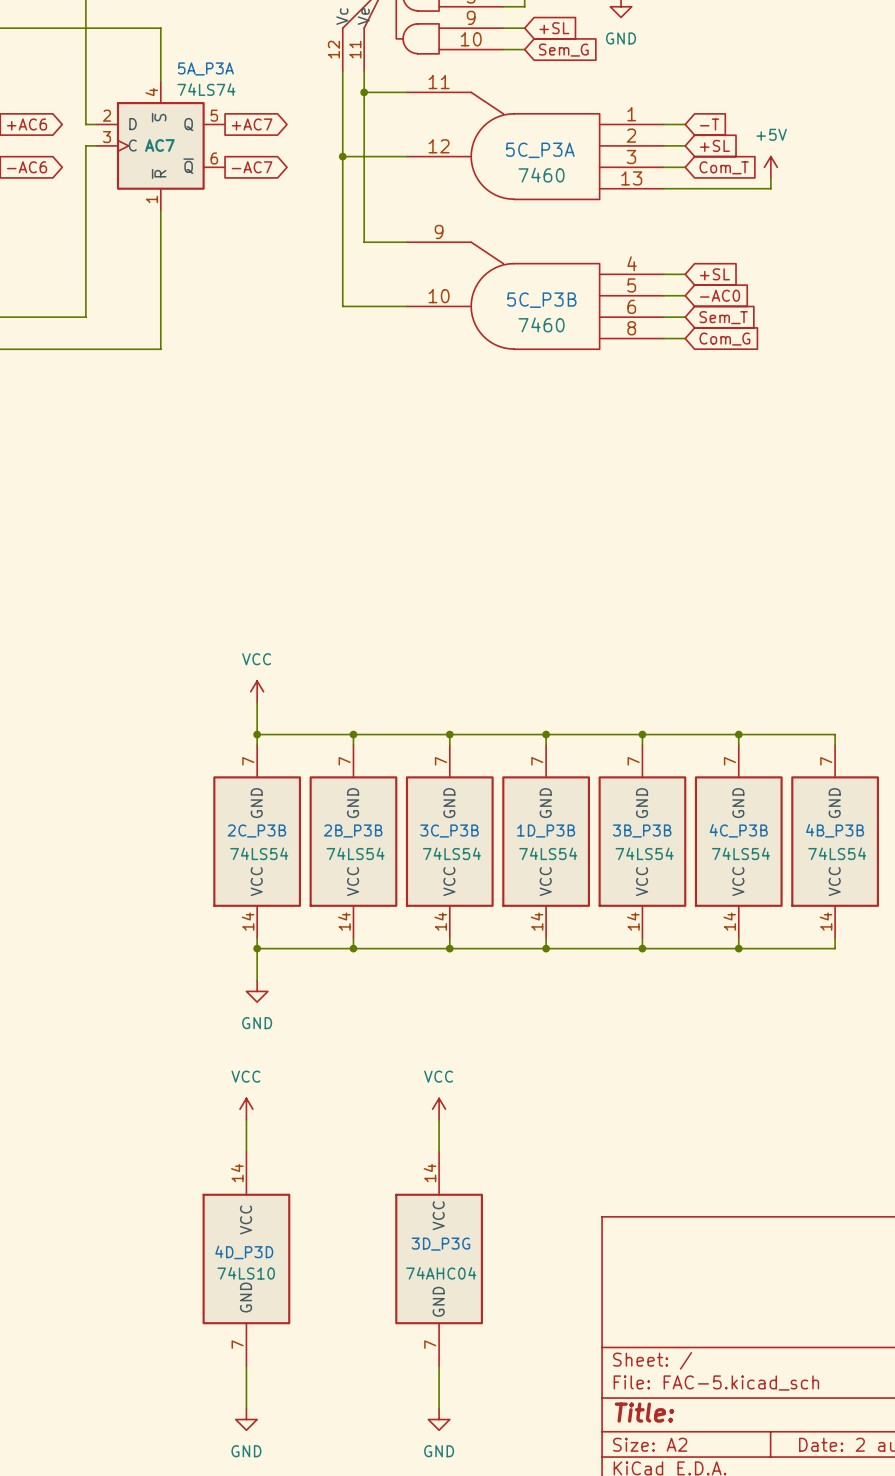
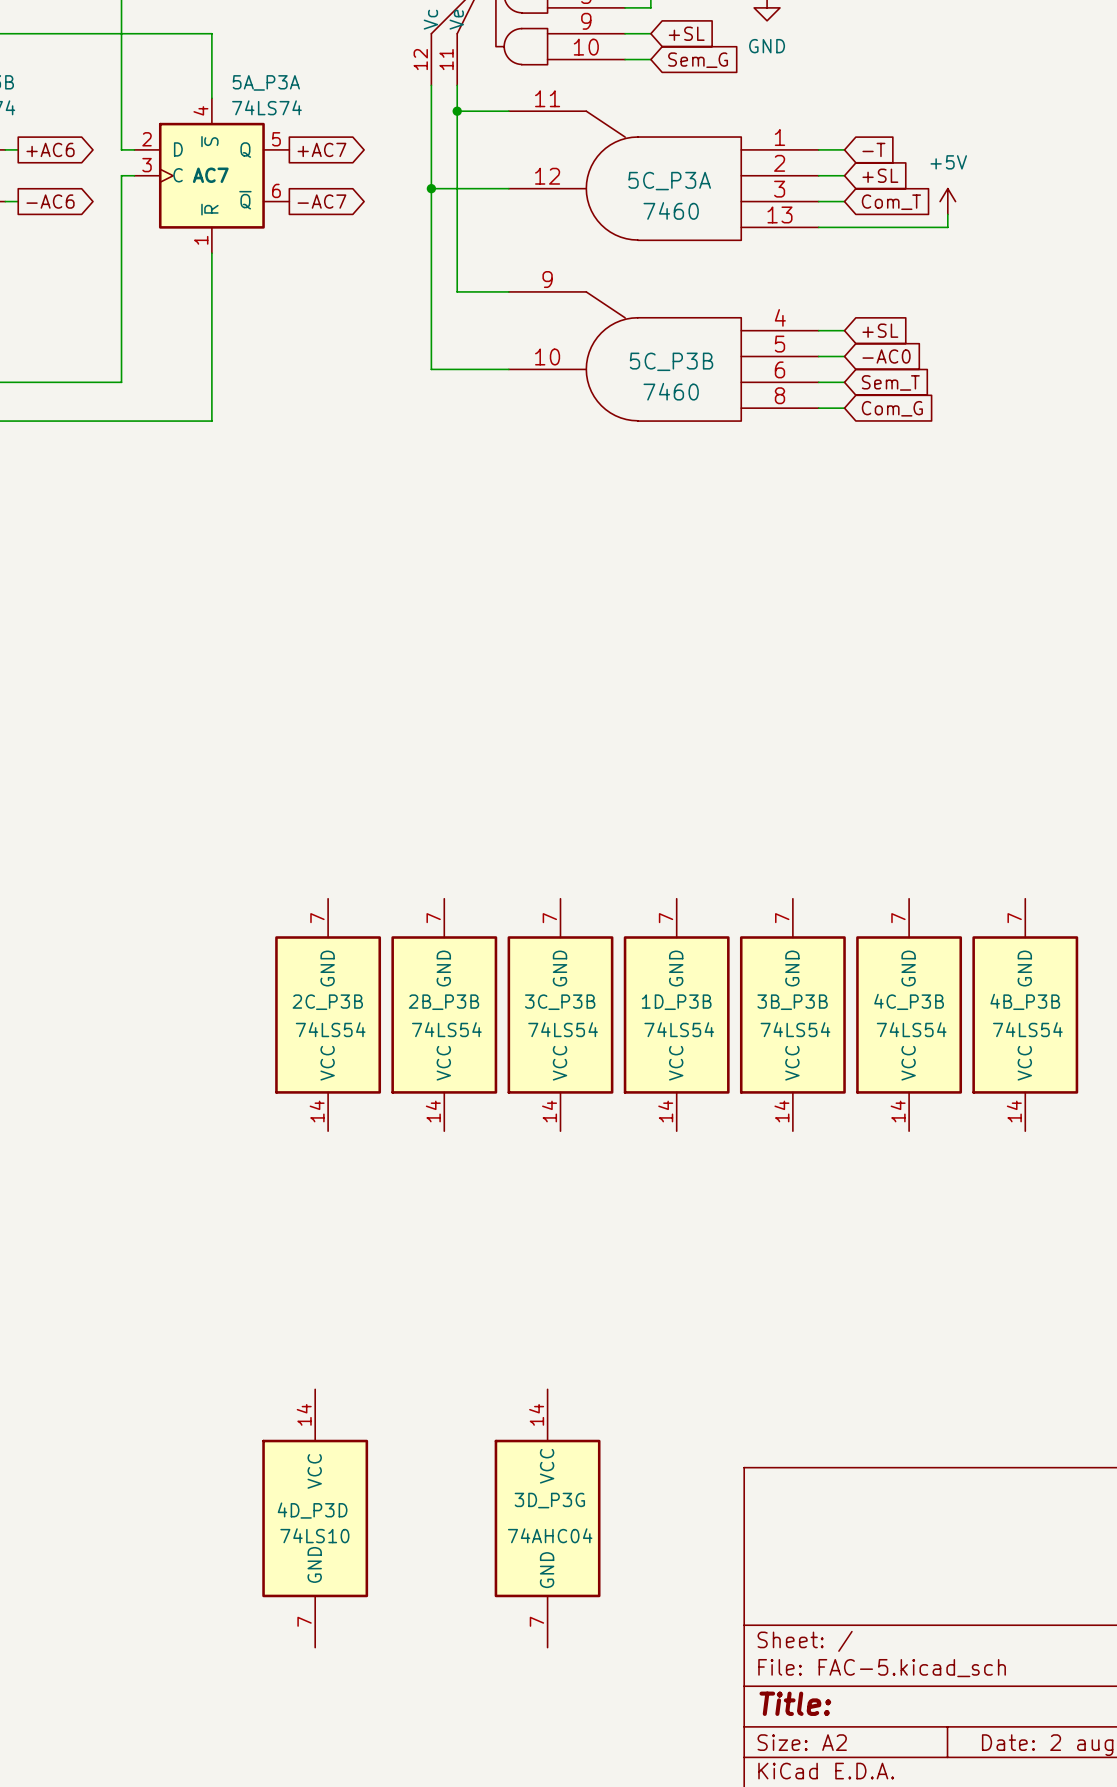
power symbol: VCC (257, 691) -> none
wire: (257, 702) (257, 745) -> none
wire: (257, 734) (835, 734) (835, 745) -> none
junction: (257, 734) -> none
wire: (353, 734) (353, 745) -> none
junction: (353, 734) -> none
wire: (449, 734) (449, 745) -> none
junction: (449, 734) -> none
wire: (546, 734) (546, 745) -> none
junction: (546, 734) -> none
wire: (642, 734) (642, 745) -> none
junction: (642, 734) -> none
wire: (738, 734) (738, 745) -> none
junction: (738, 734) -> none
wire: (257, 937) (257, 980) -> none
wire: (353, 937) (353, 948) -> none
wire: (449, 937) (449, 948) -> none
wire: (546, 937) (546, 948) -> none
wire: (642, 937) (642, 948) -> none
wire: (738, 937) (738, 948) -> none
wire: (835, 937) (835, 948) (257, 948) -> none
junction: (257, 948) -> none
junction: (353, 948) -> none
junction: (449, 948) -> none
junction: (546, 948) -> none
junction: (642, 948) -> none
junction: (738, 948) -> none
power symbol: GND (257, 991) -> none
power symbol: VCC (246, 1109) -> none
power symbol: VCC (439, 1109) -> none
wire: (246, 1119) (246, 1151) -> none
wire: (439, 1119) (439, 1151) -> none
wire: (246, 1366) (246, 1408) -> none
wire: (439, 1366) (439, 1408) -> none
power symbol: GND (246, 1419) -> none
power symbol: GND (439, 1419) -> none

